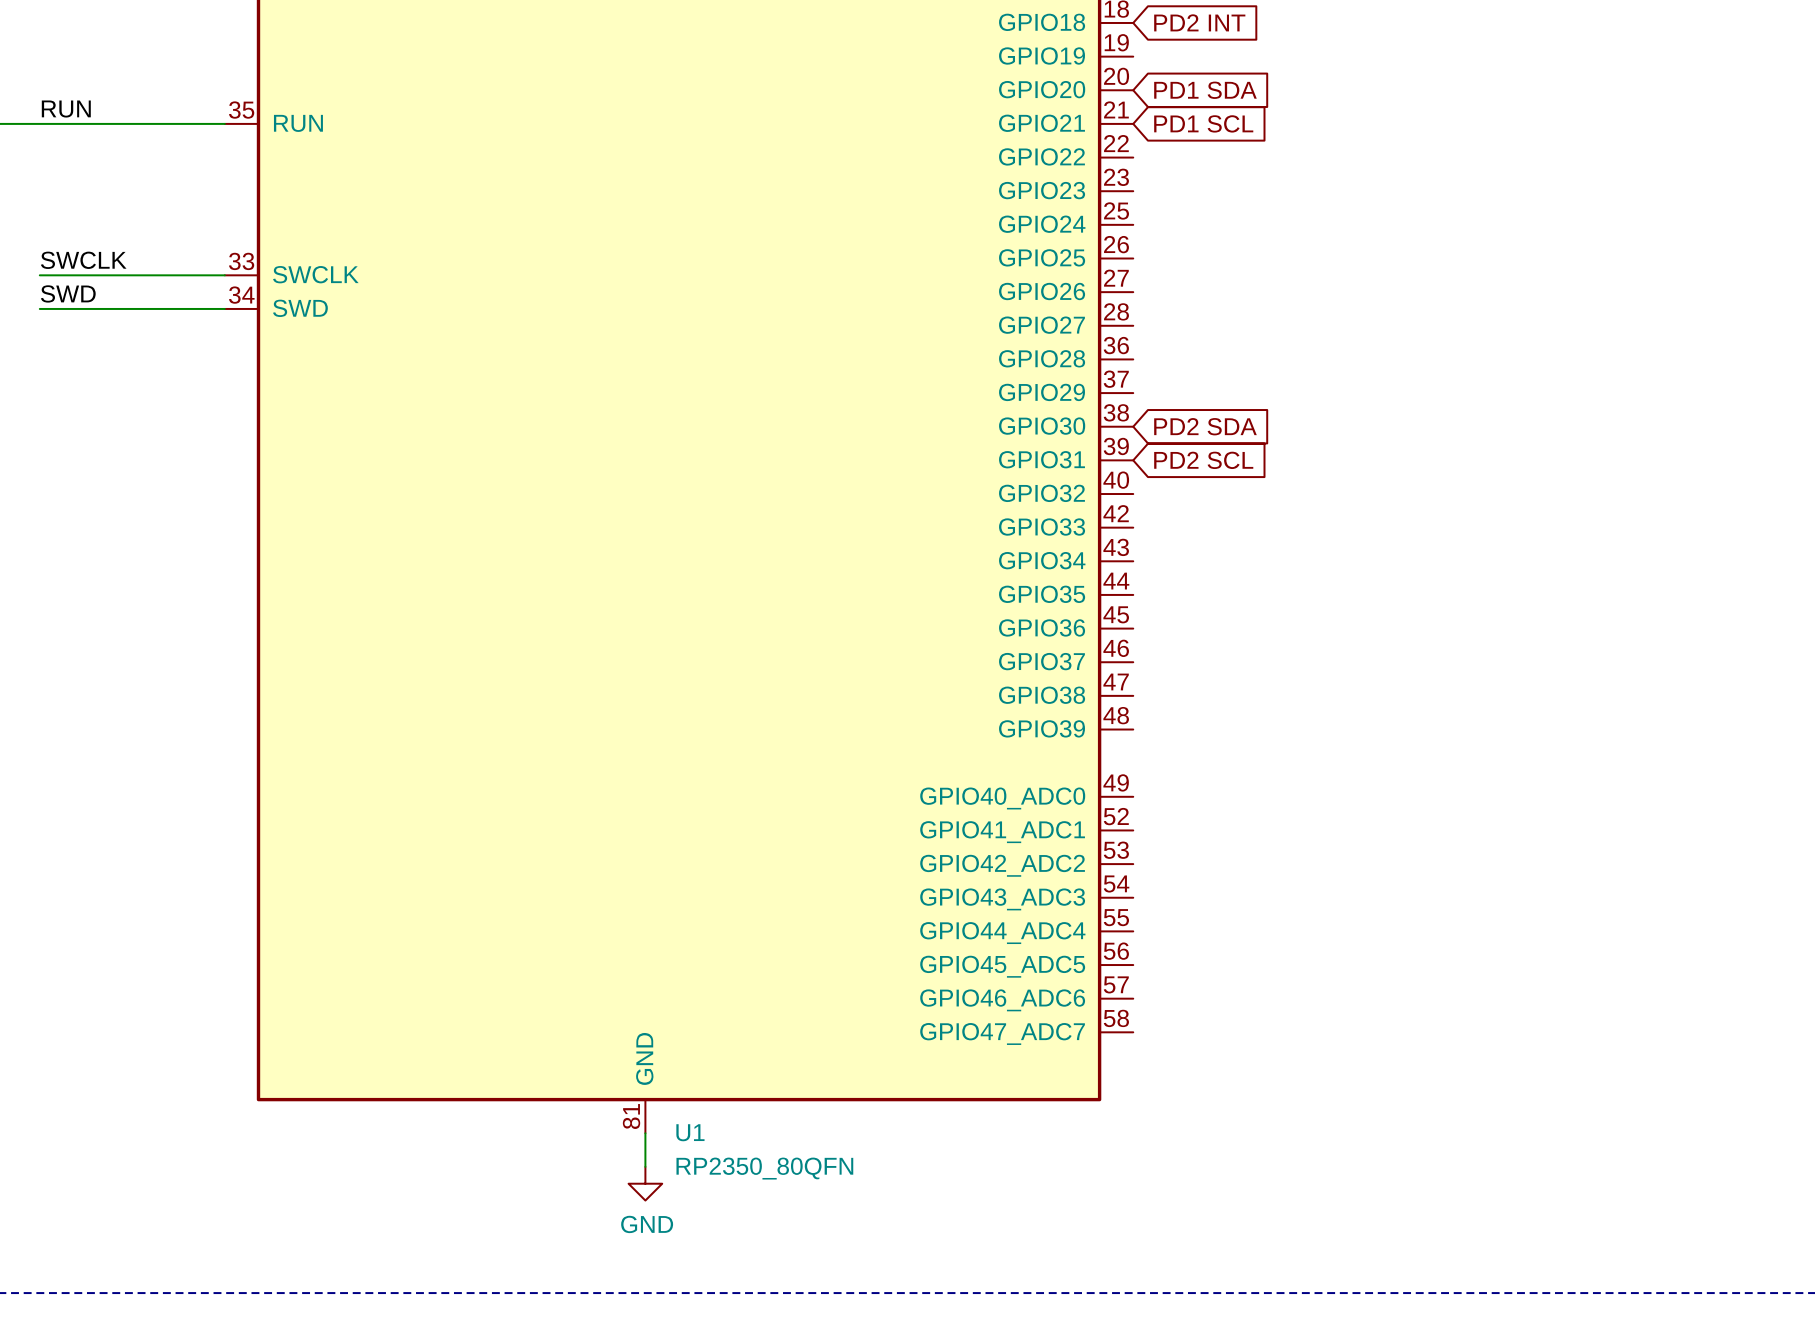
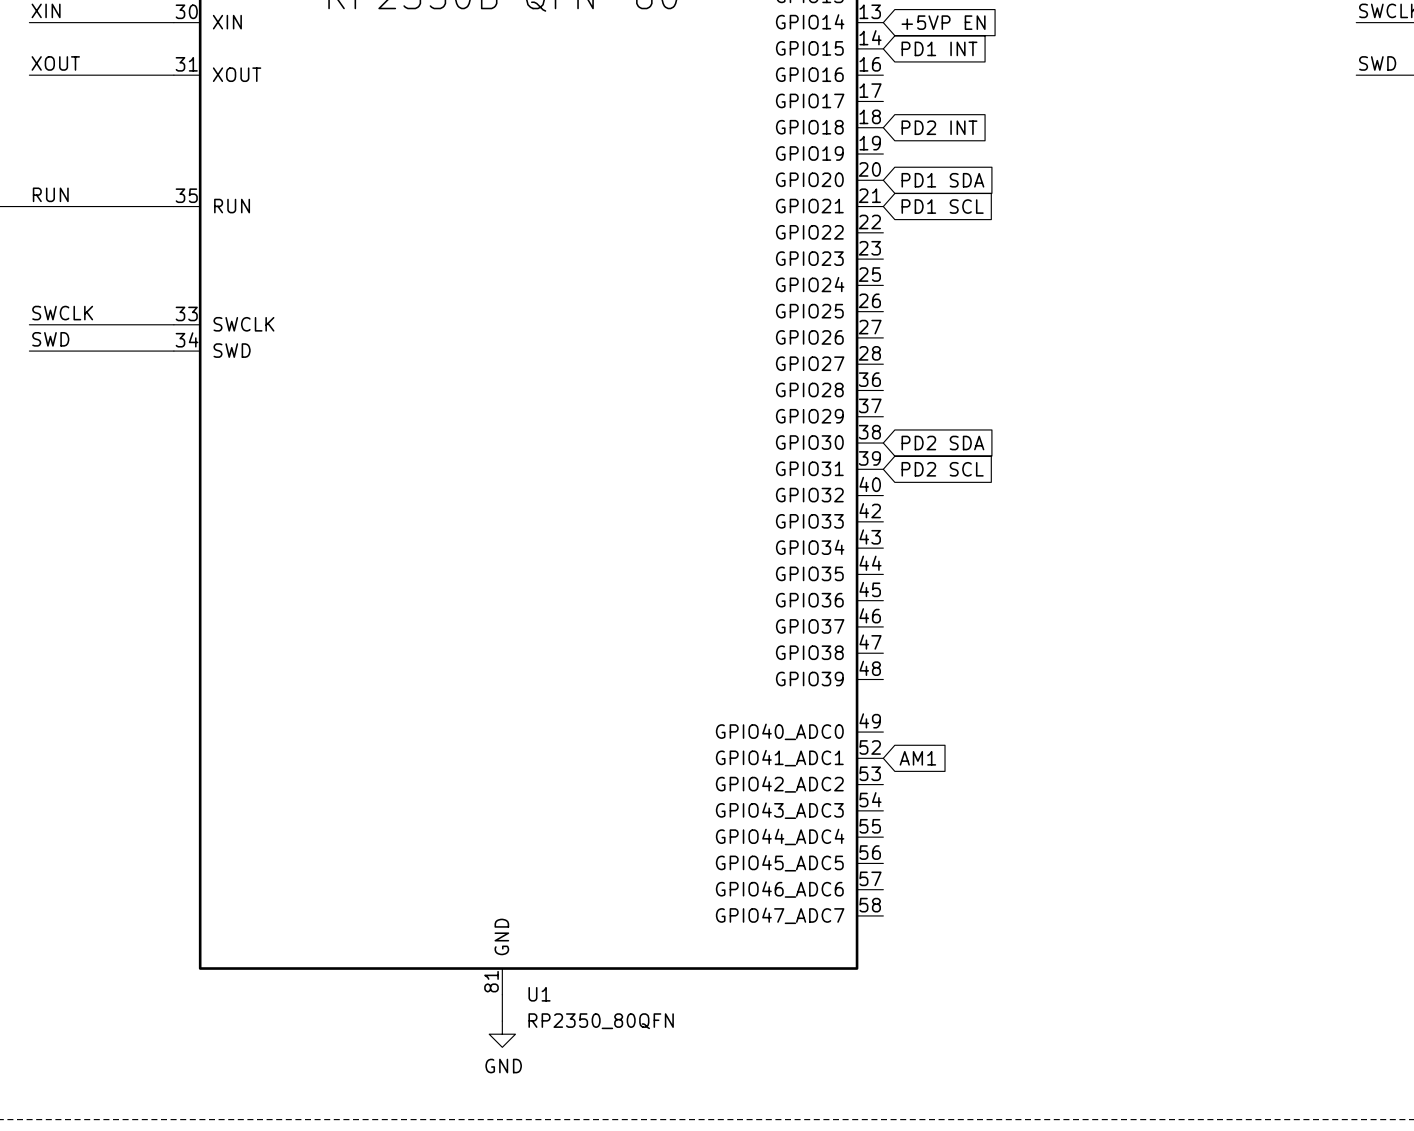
global label: none -> AM1 (917, 758)

